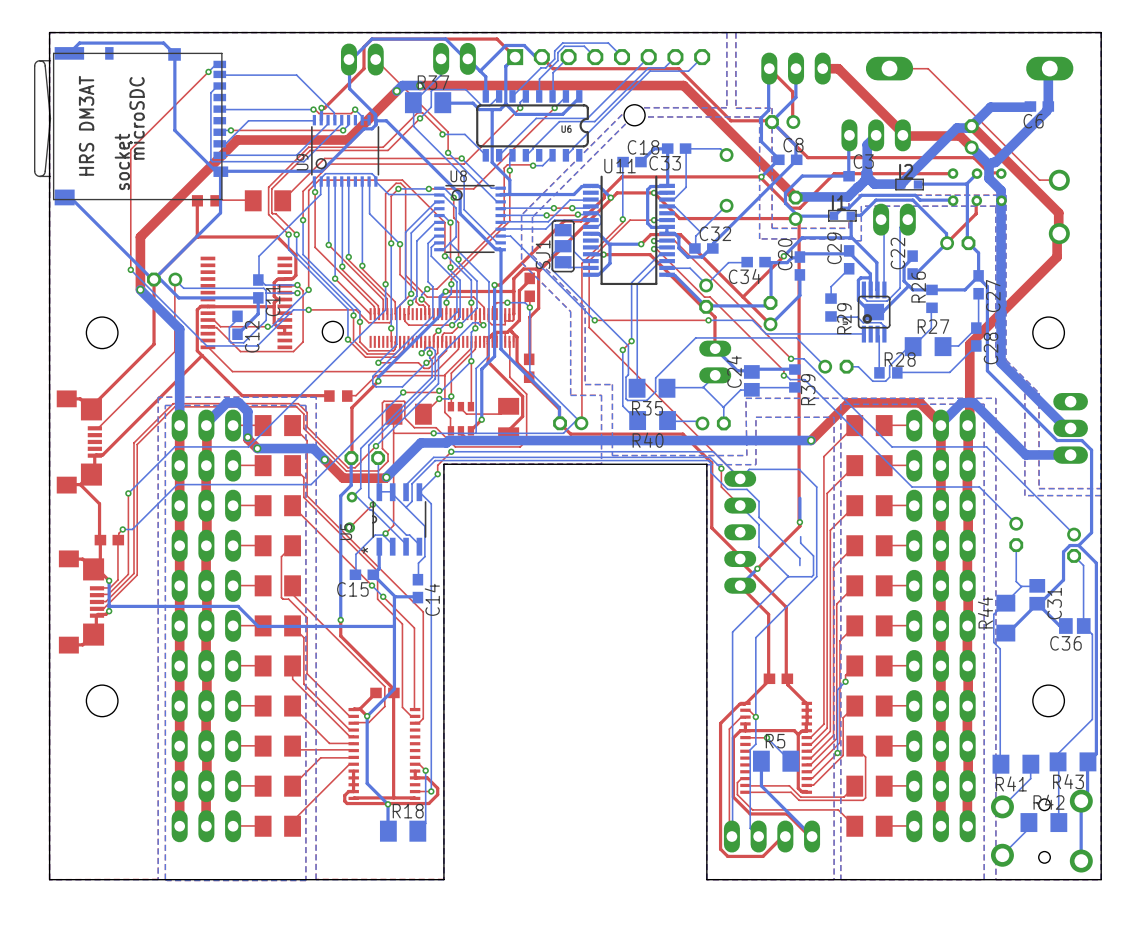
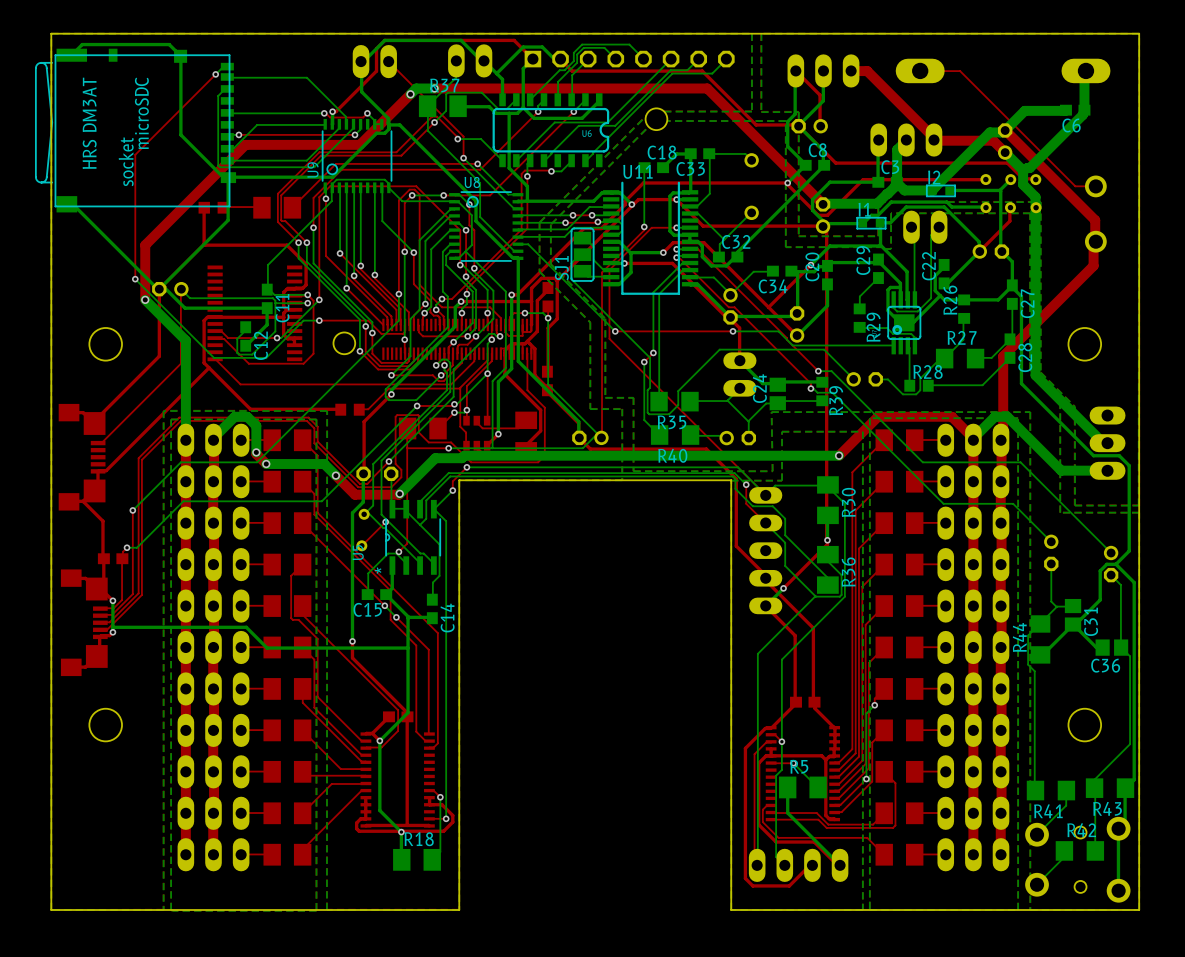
R30: none -> (827, 500)
R36: none -> (827, 569)

